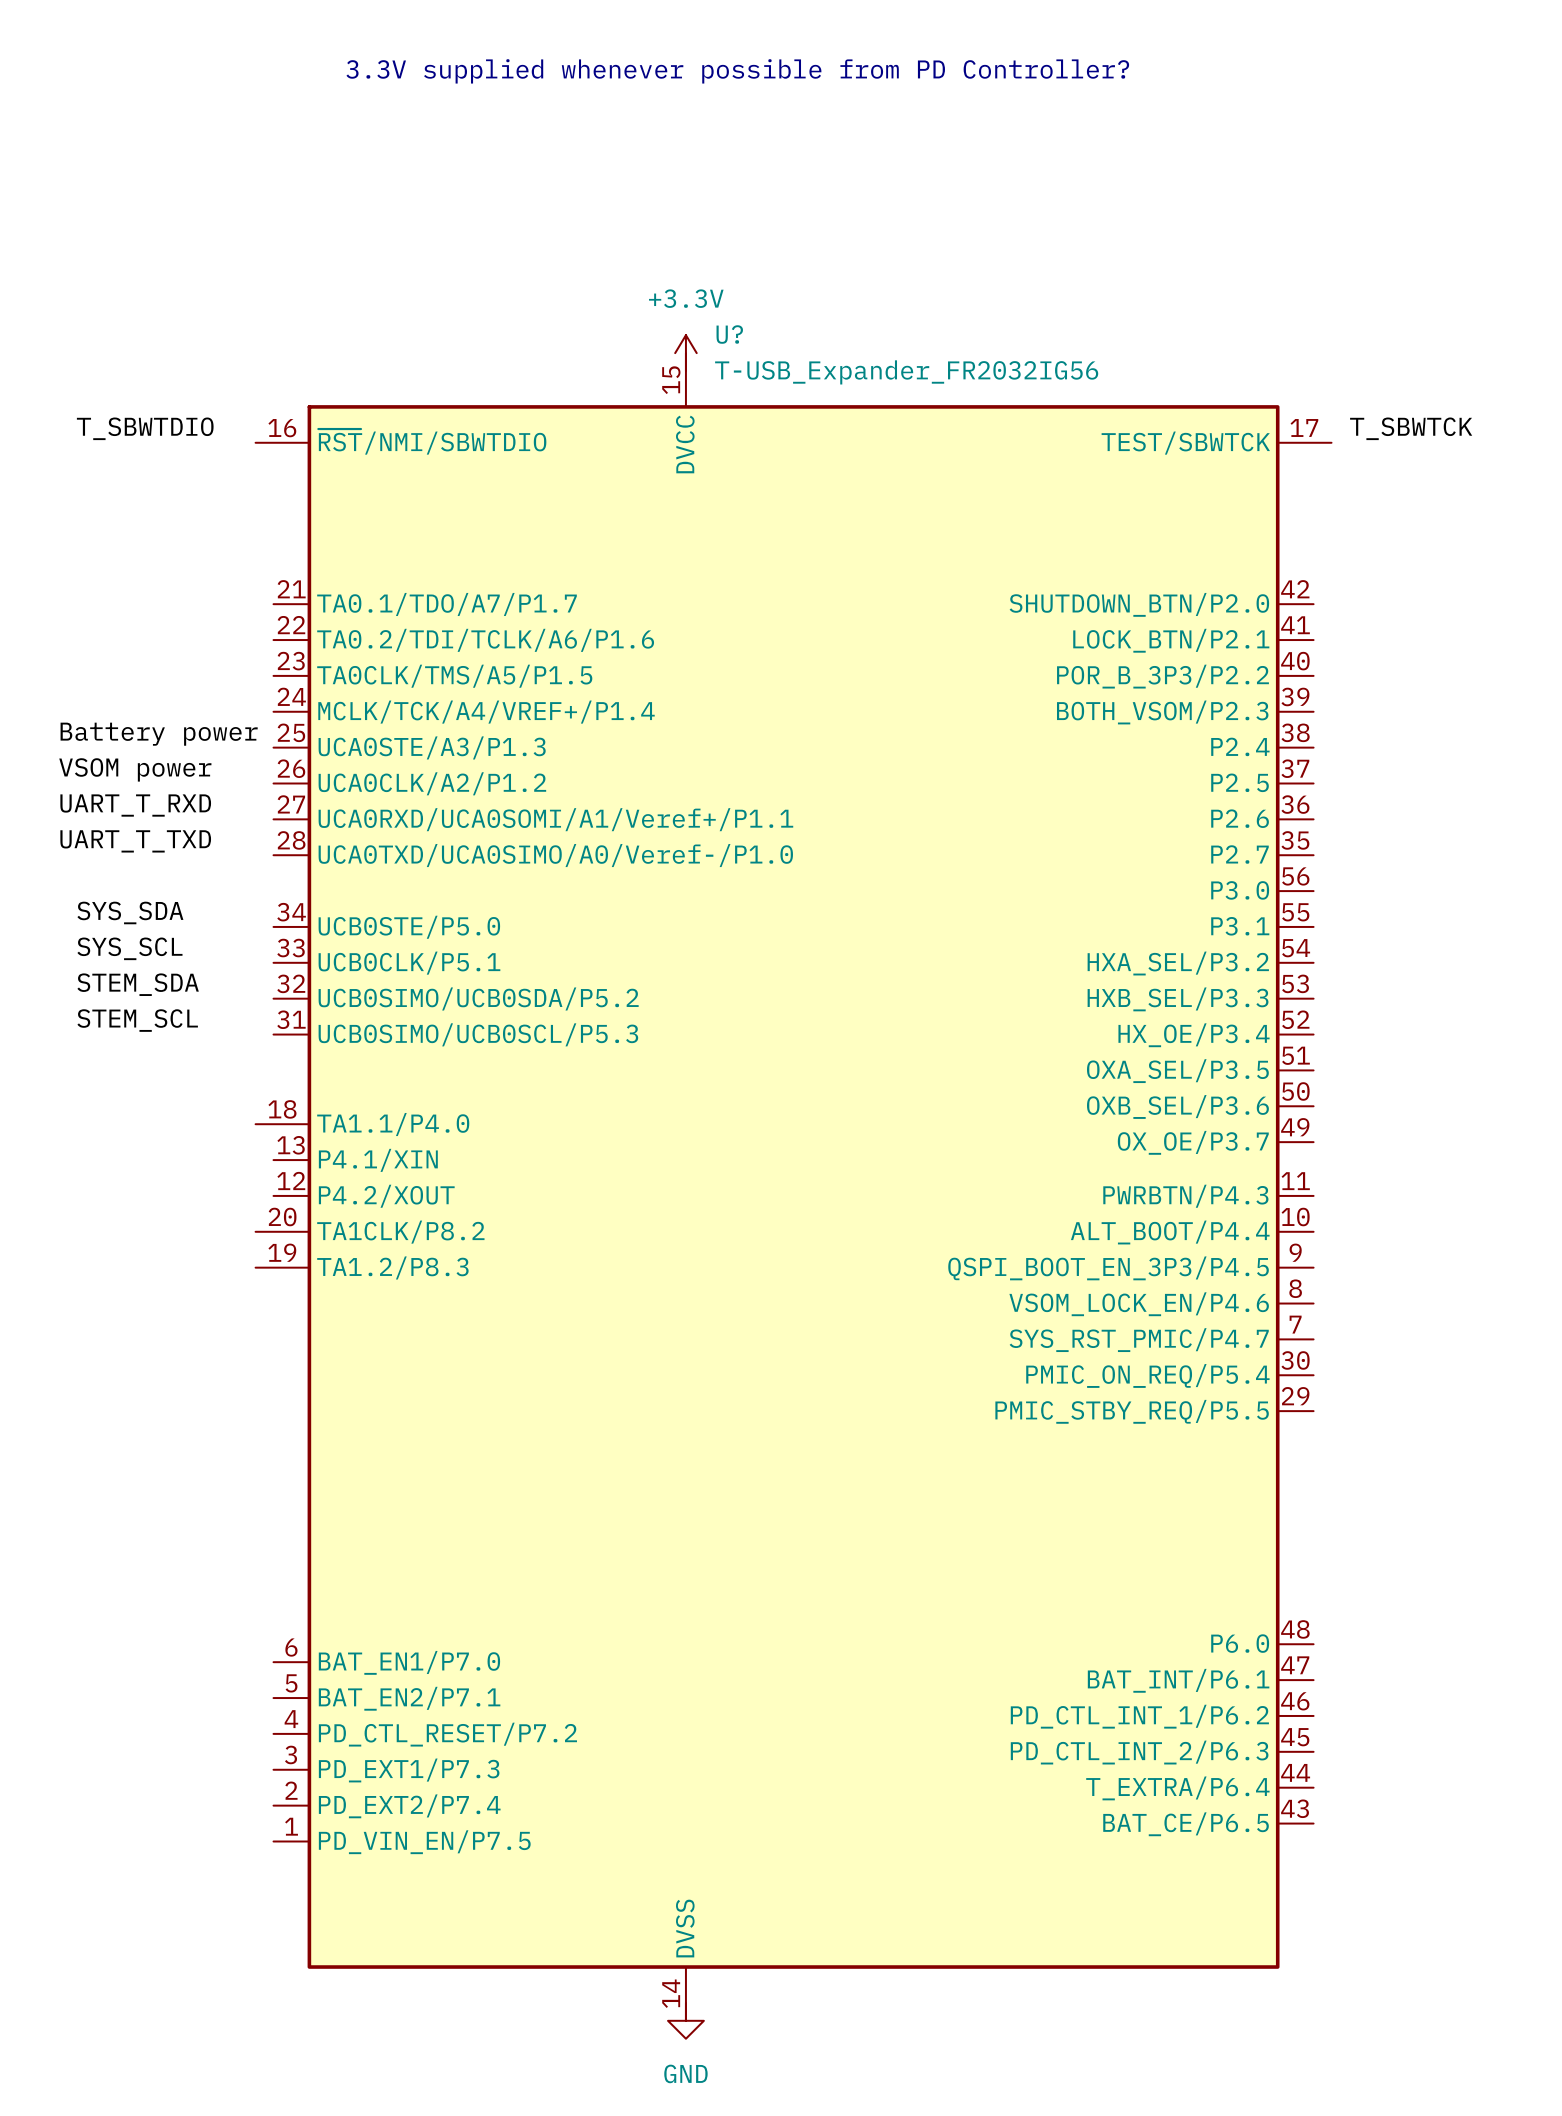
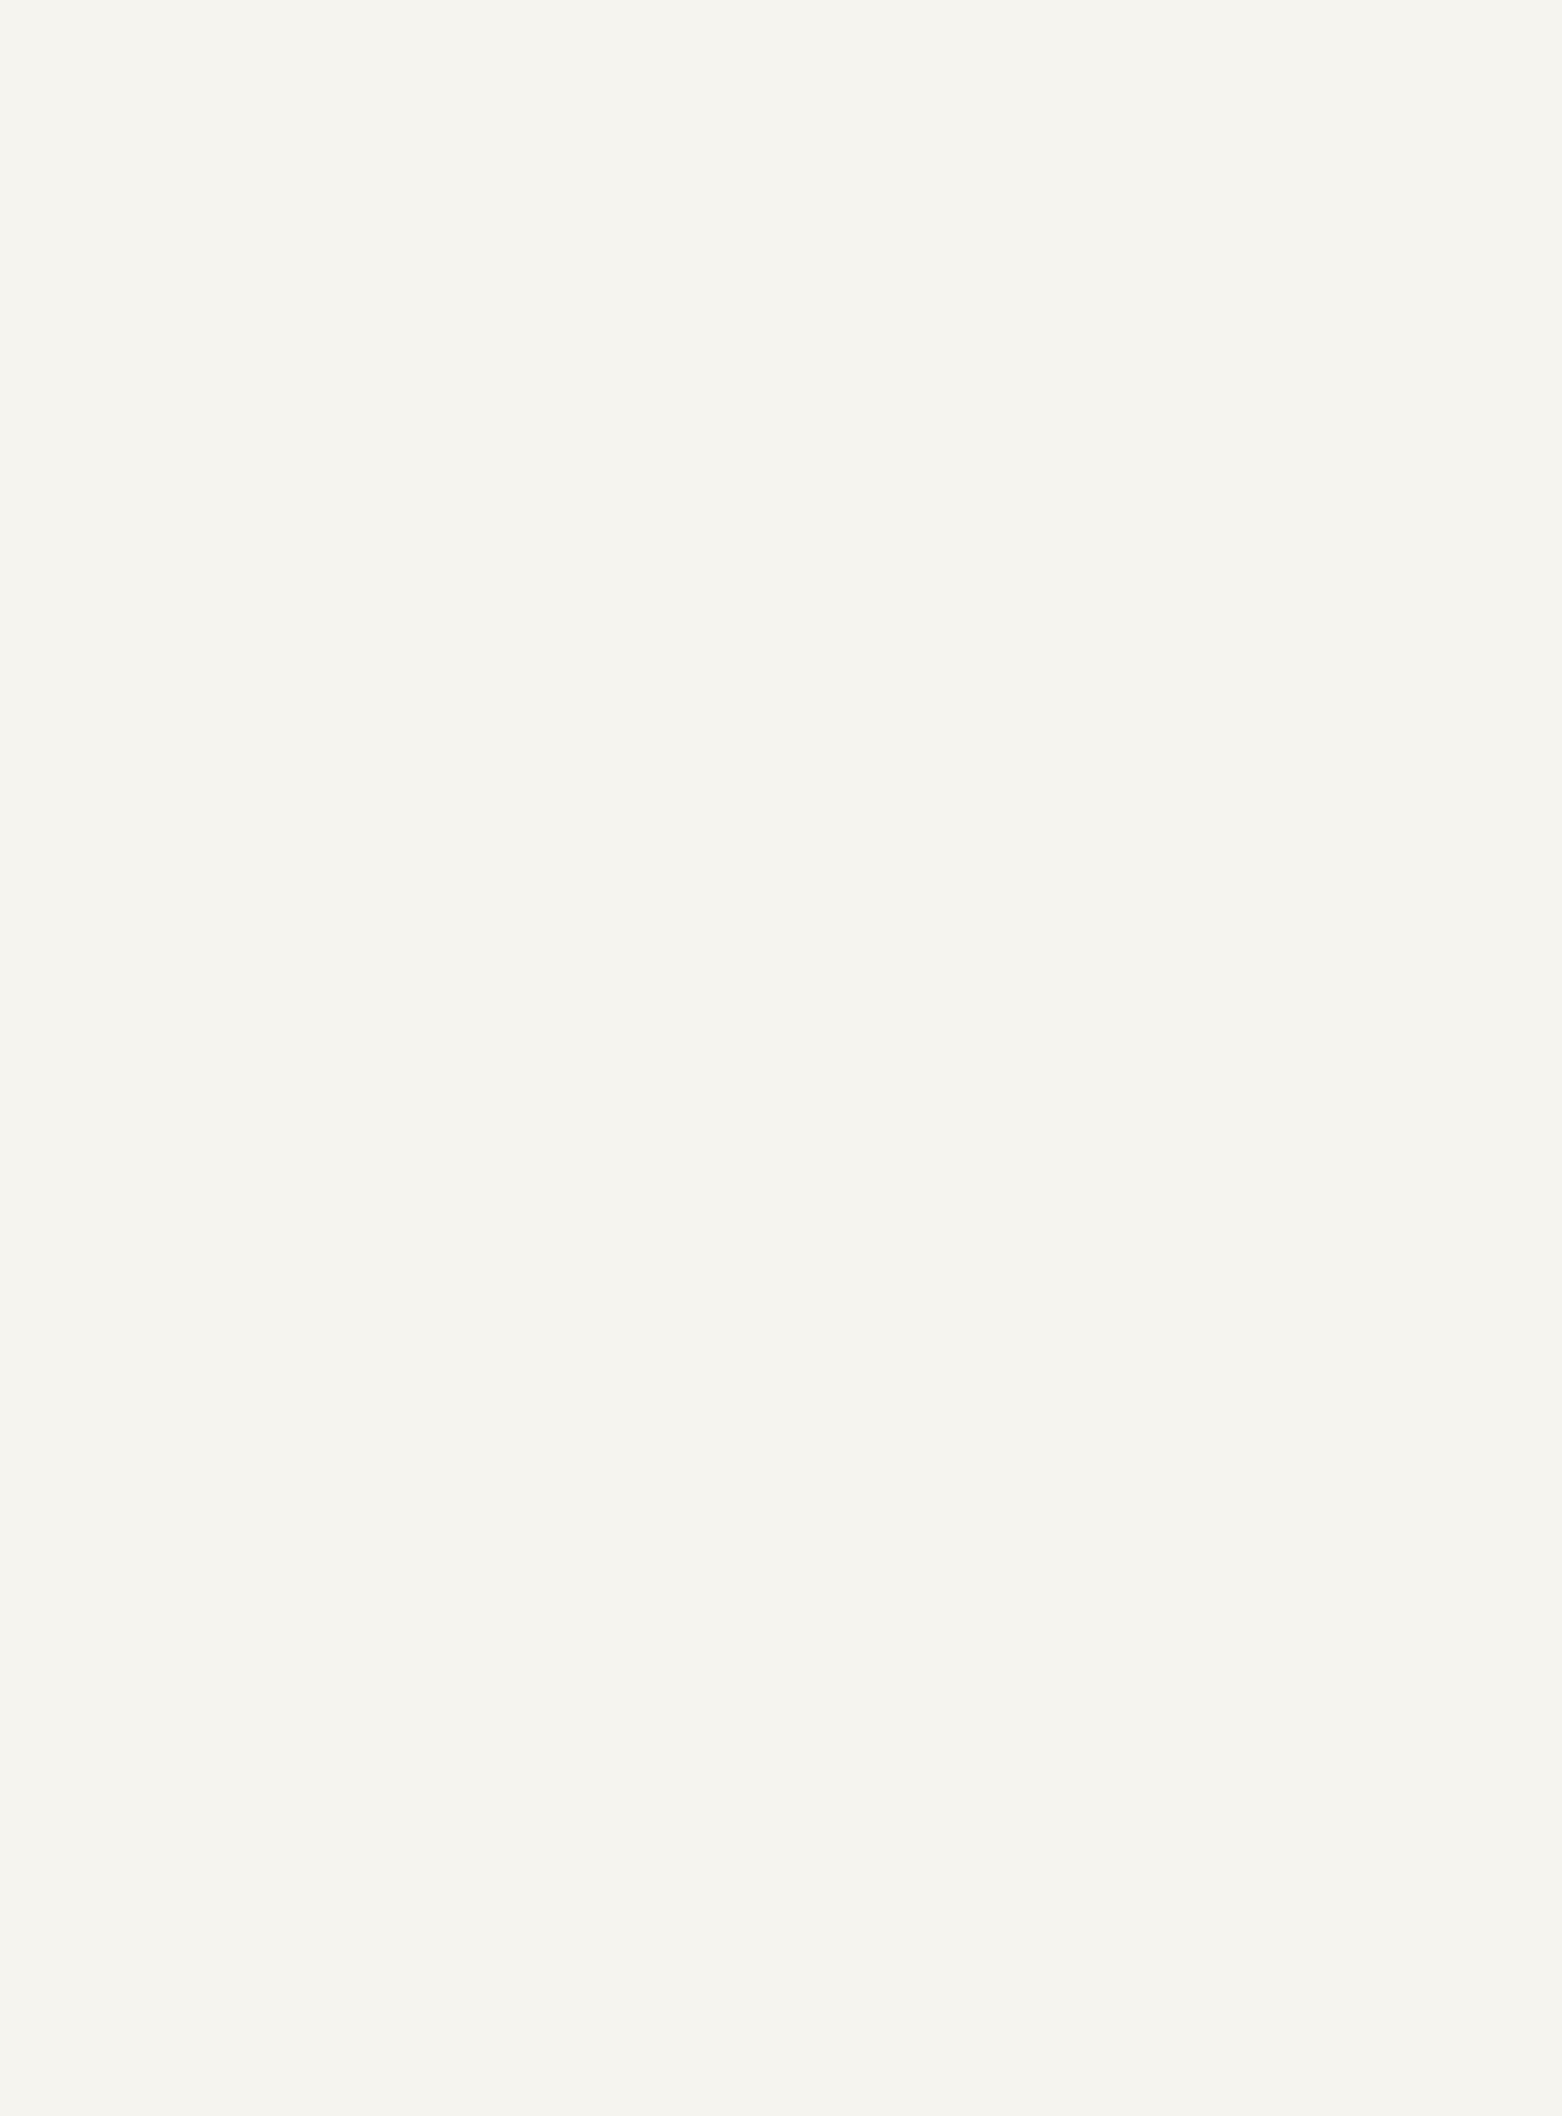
text: 3.3V supplied whenever possible from PD Controller? (737, 71) -> none
power symbol: +3.3V (685, 353) -> none
label: T_SBWTDIO (145, 428) -> none
label: T_SBWTCK (1411, 428) -> none
label: Battery power (159, 734) -> none
label: VSOM power (135, 769) -> none
label: UART_T_RXD (135, 805) -> none
label: UART_T_TXD (135, 841) -> none
label: SYS_SDA (130, 912) -> none
label: SYS_SCL (129, 948) -> none
label: STEM_SDA (138, 984) -> none
label: STEM_SCL (137, 1020) -> none
U?: T-USB_Expander_FR2032IG56 (793, 1186) -> none
power symbol: GND (685, 2020) -> none

